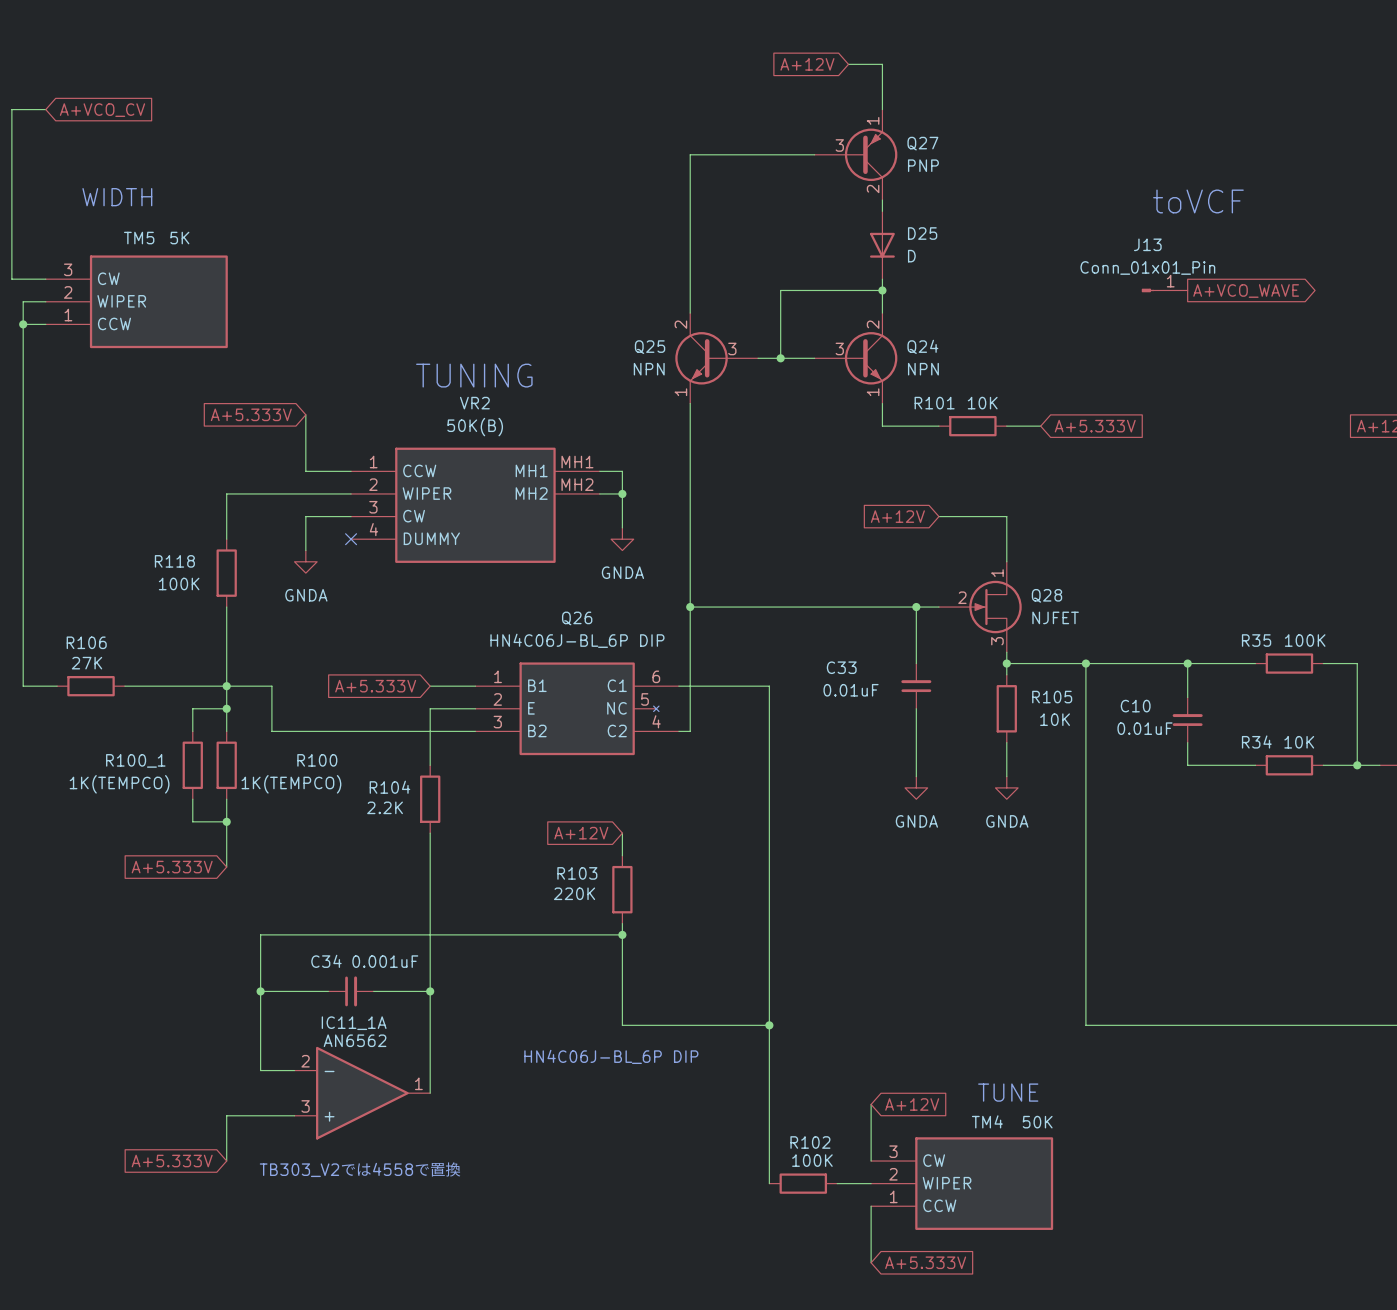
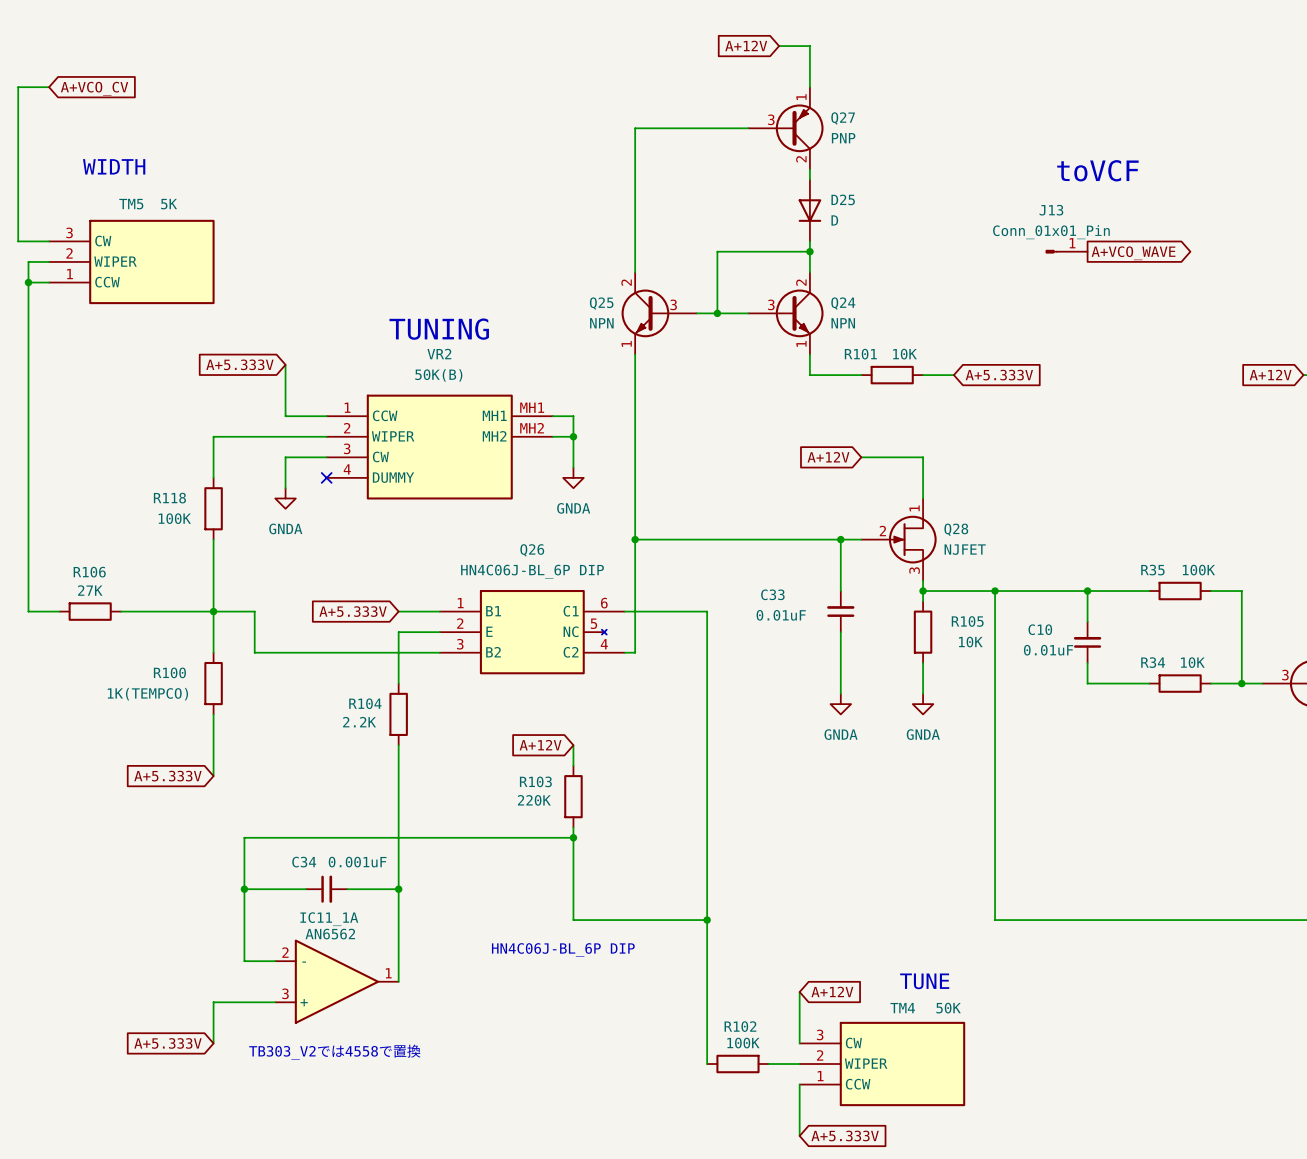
wire: (226, 708) (192, 708) (192, 731) -> none
junction: (226, 708) -> none
R100 name position: R100 (317, 760) -> R100 (169, 672)
R100_1: 1K(TEMPCO) (192, 765) -> none
R100 value position: 1K(TEMPCO) (291, 784) -> 1K(TEMPCO) (147, 694)
wire: (192, 799) (192, 821) (226, 821) -> none
junction: (226, 821) -> none

